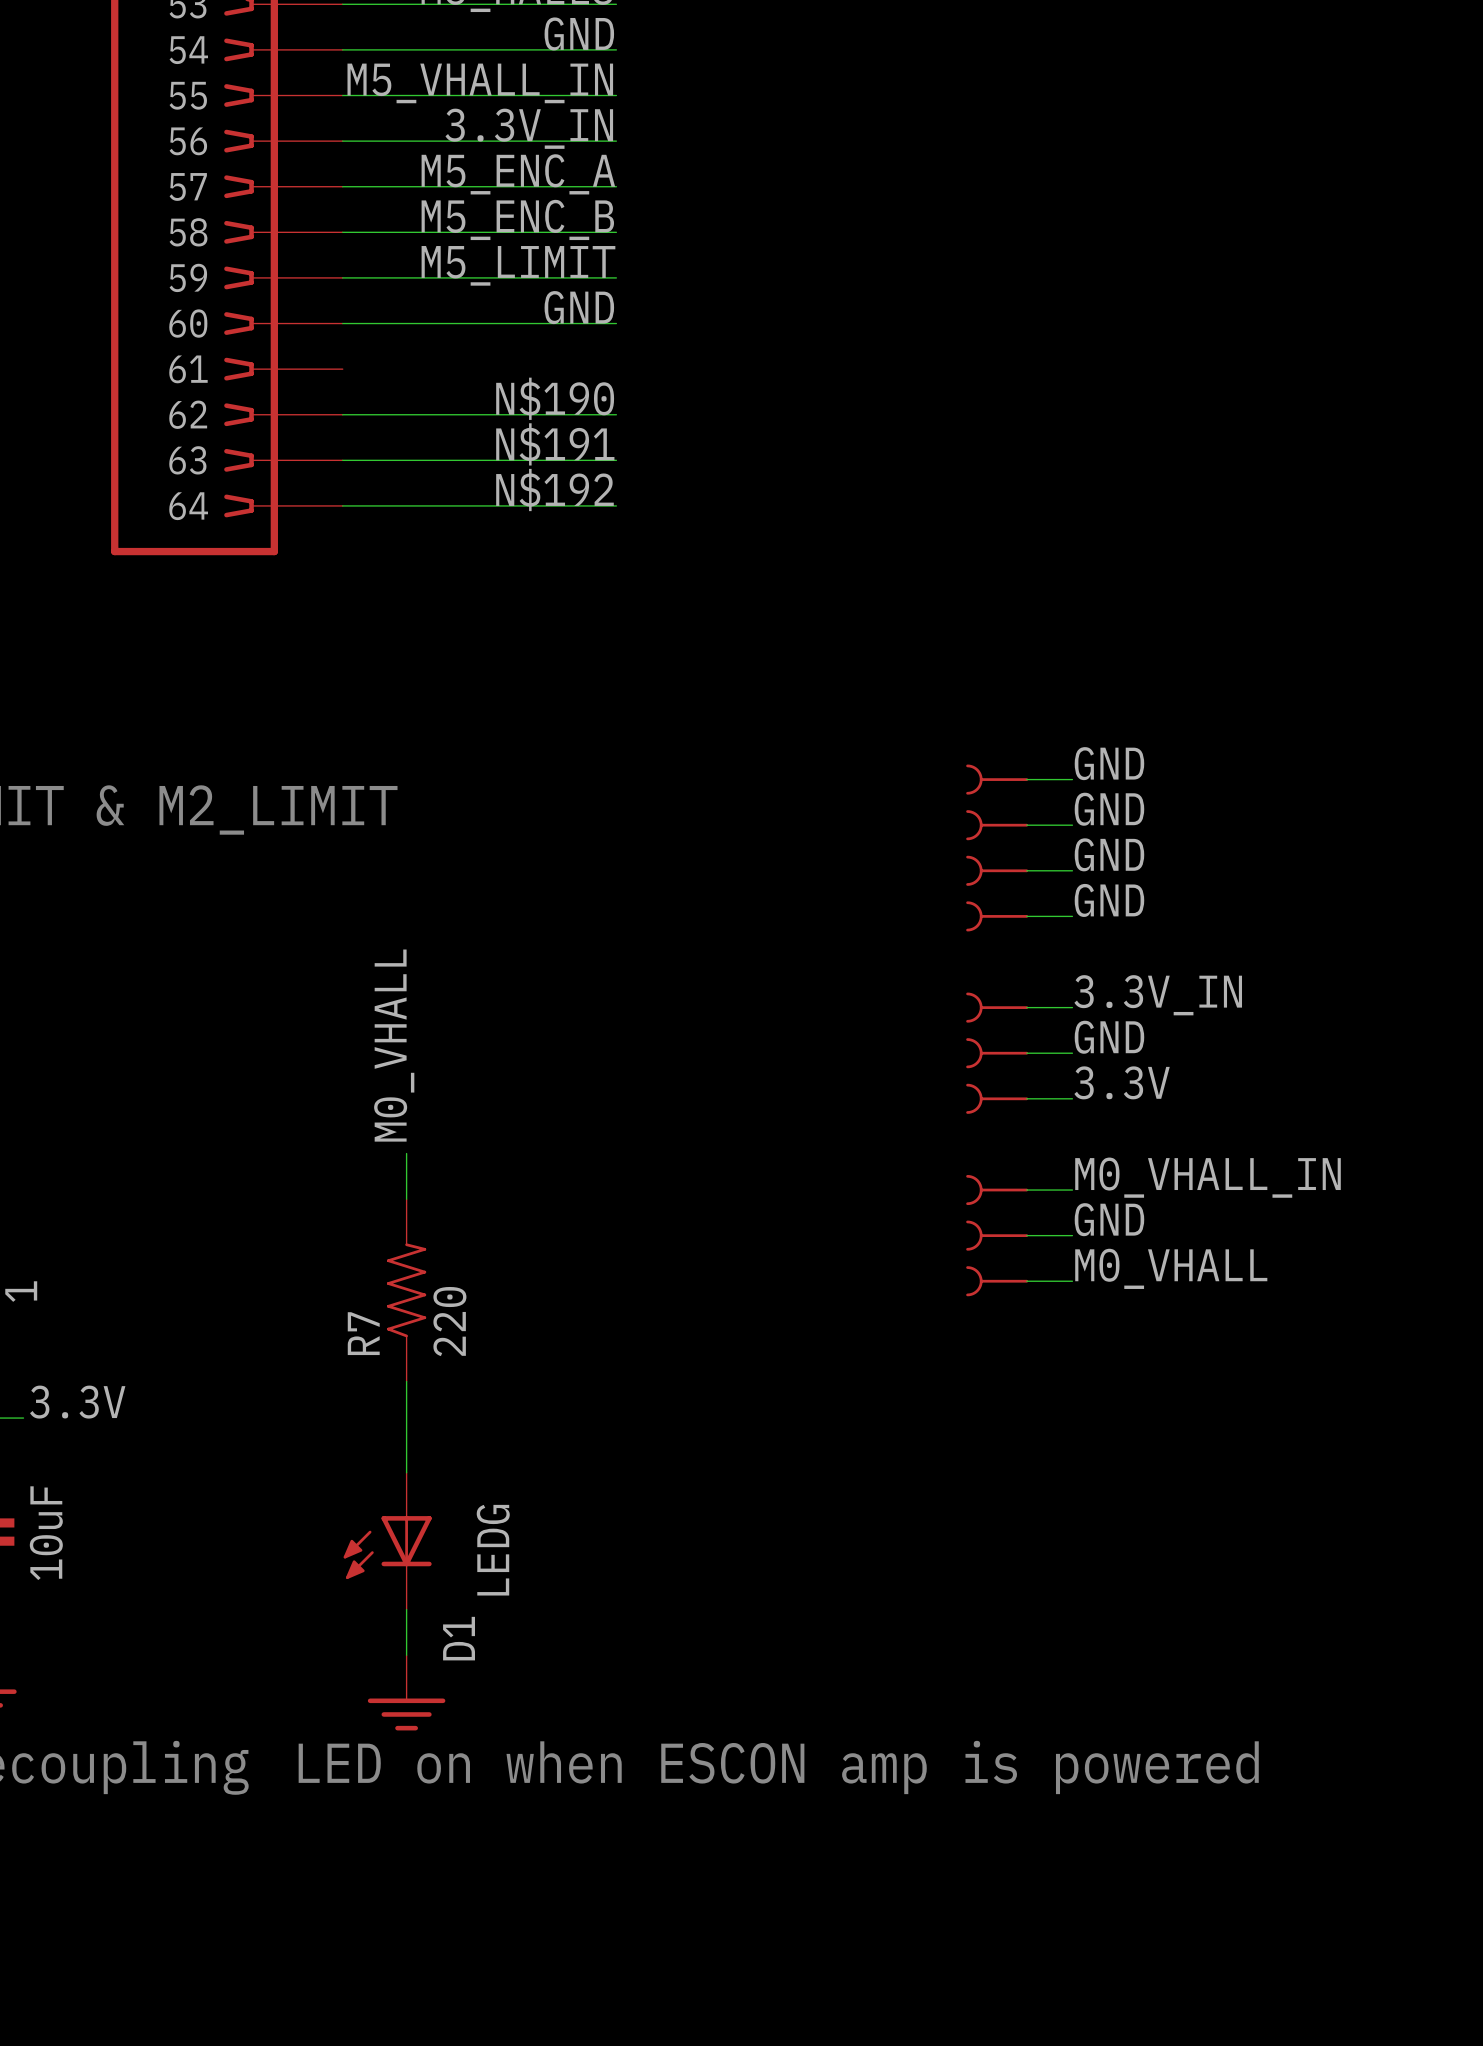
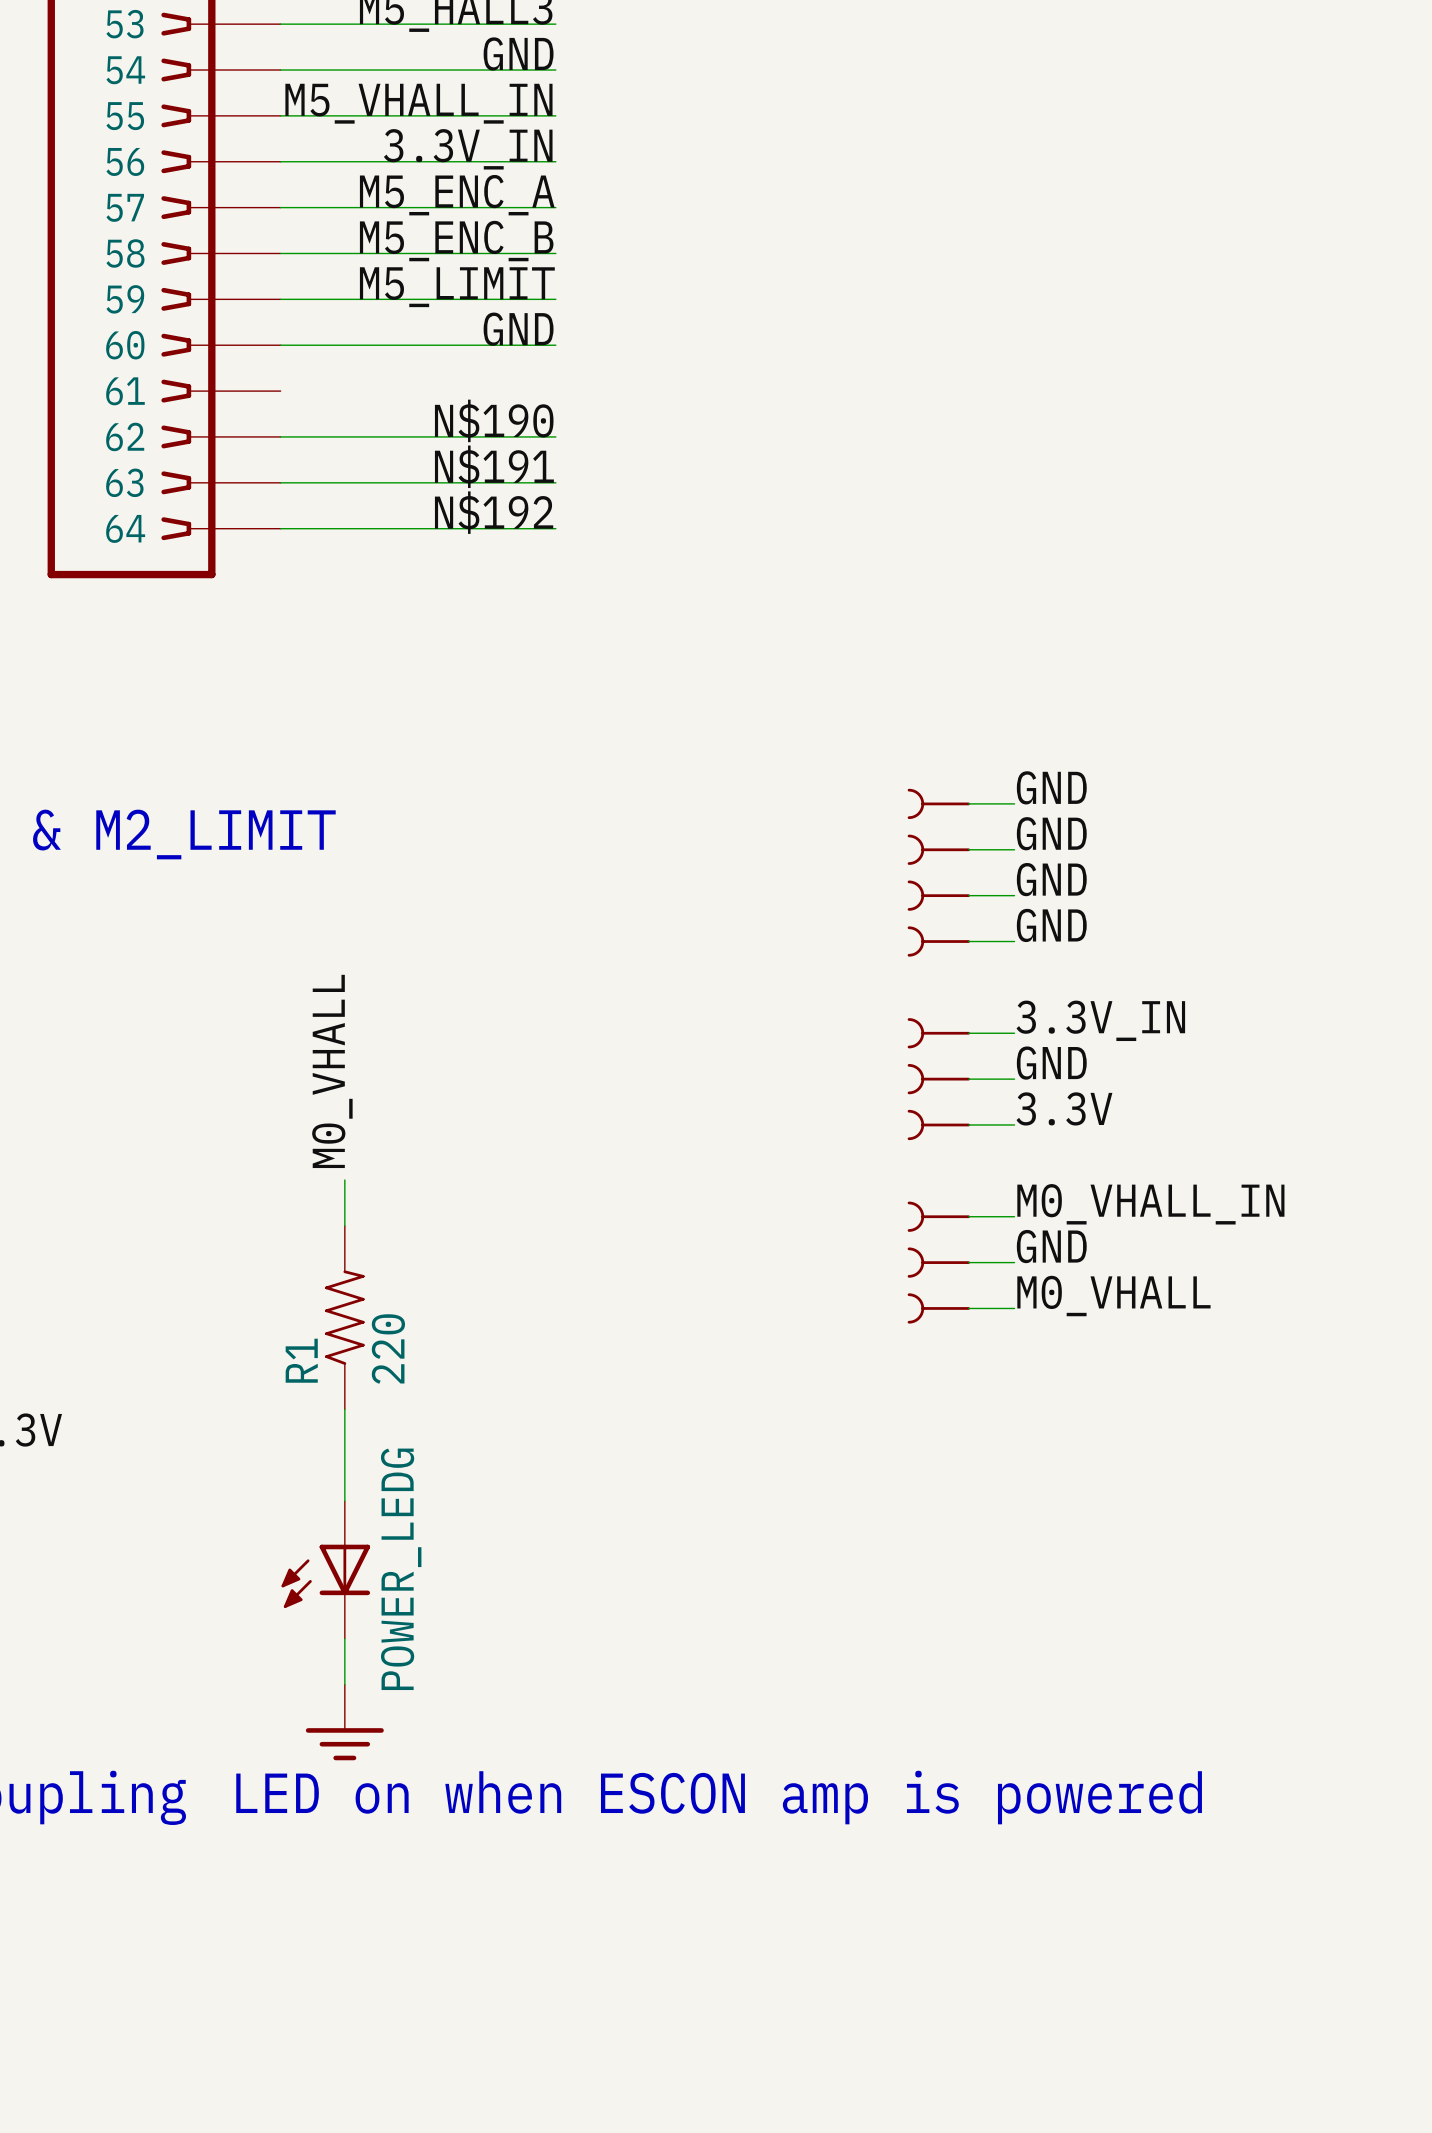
R7 name: R7 (363, 1333) -> R1 (301, 1360)
D1 value: LEDG (493, 1550) -> none
D1 name: D1 (459, 1638) -> POWER_LEDG (401, 1569)

